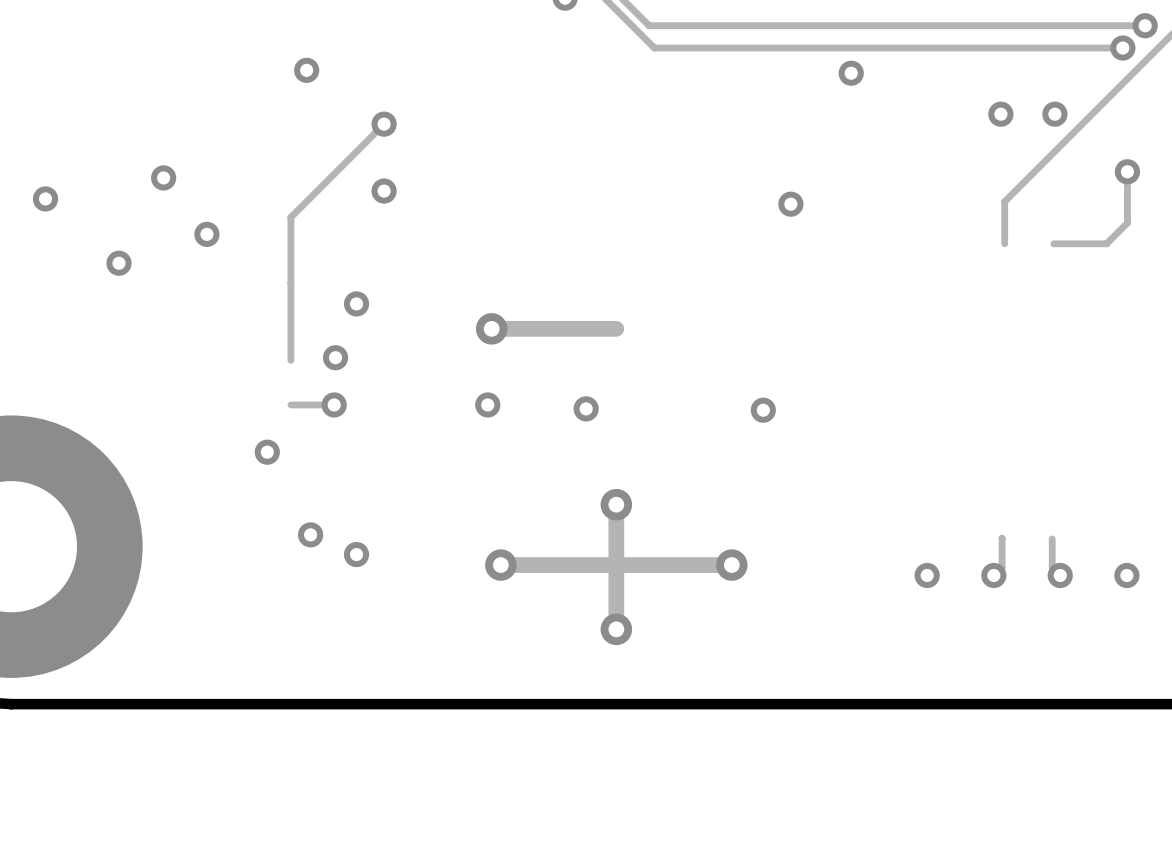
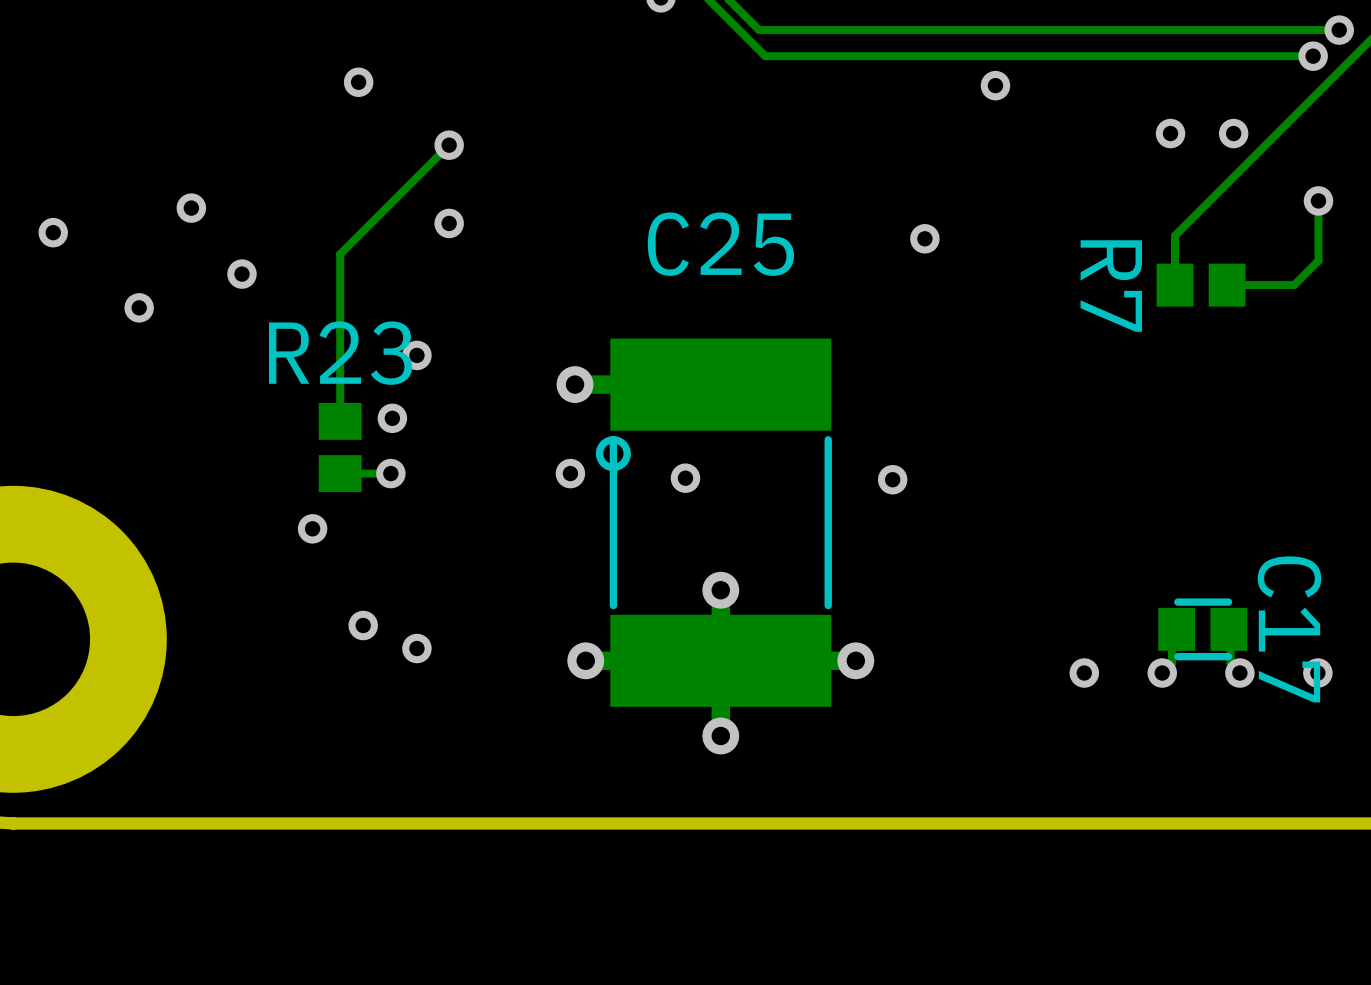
R7: none -> (1201, 285)
R23: none -> (340, 447)
C25: none -> (713, 522)
C17: none -> (1202, 629)

